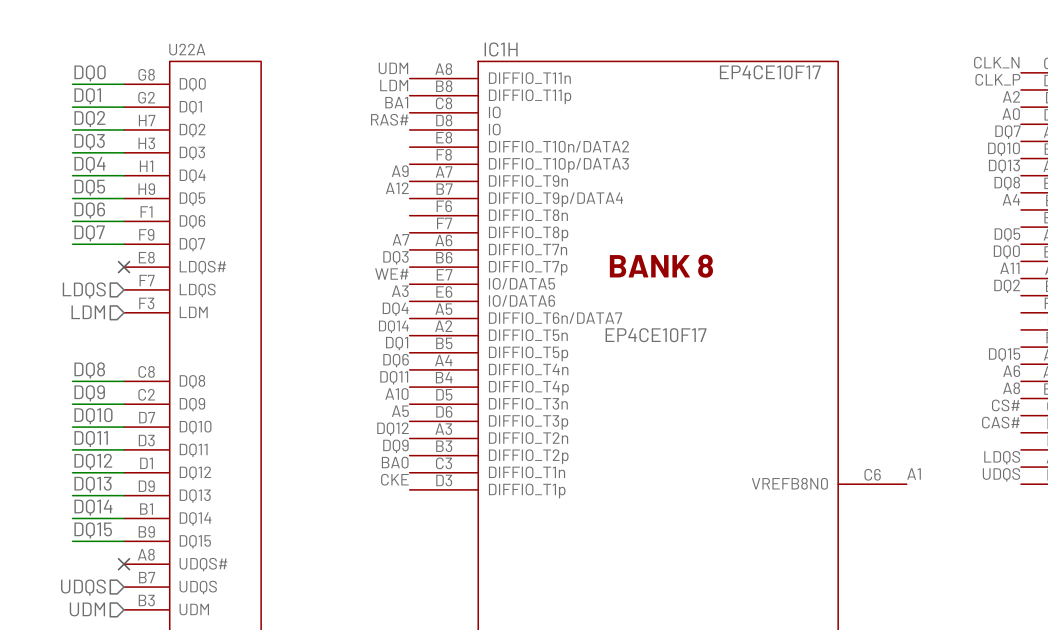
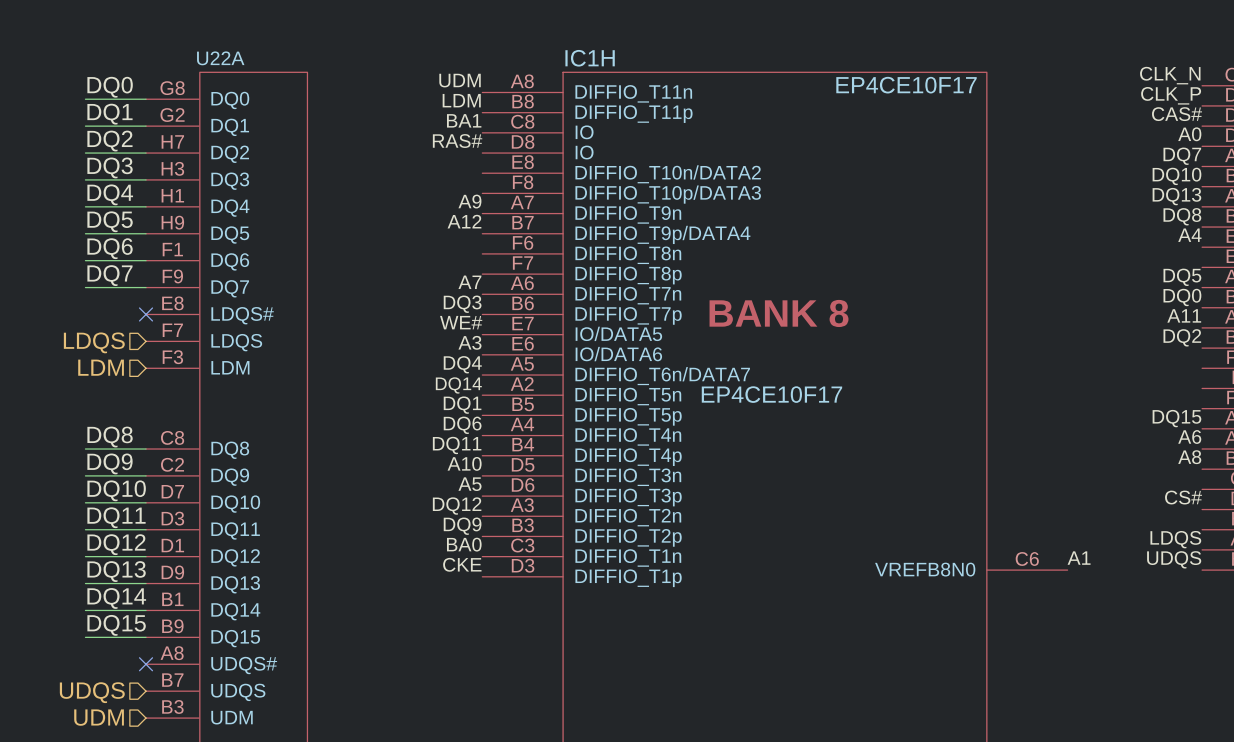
label: A2 (1011, 96) -> CAS# (1177, 114)
label: CS# (1005, 405) -> none
label: CAS# (1000, 422) -> CS# (1183, 497)

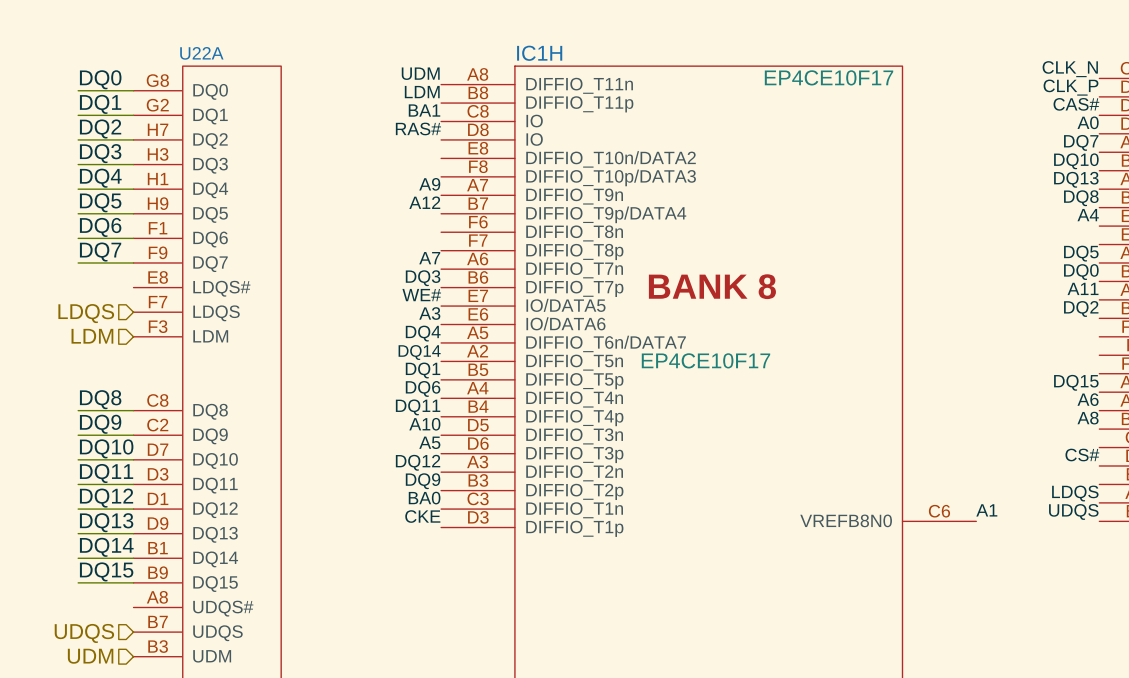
no-connect mark: (146, 314) -> none
no-connect mark: (146, 664) -> none

